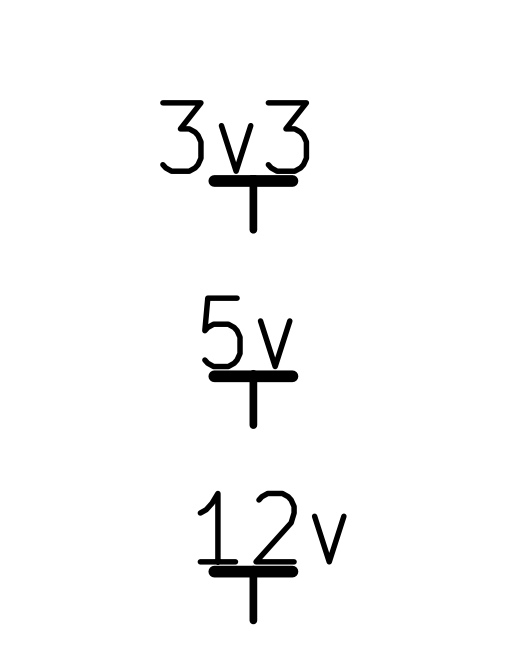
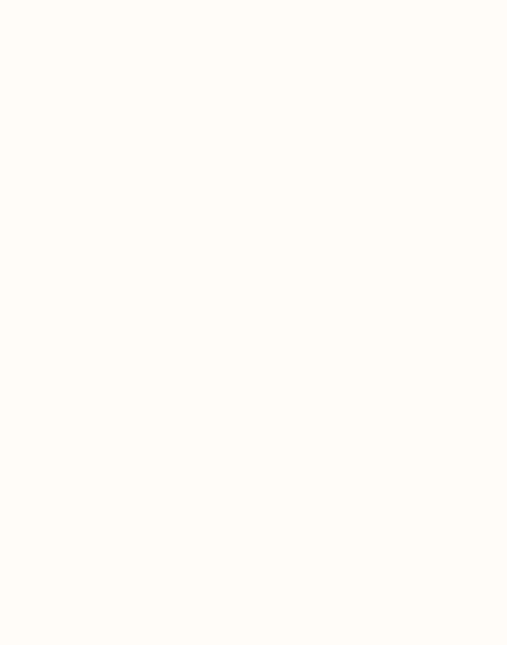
power symbol: (253, 204) -> none
power symbol: (253, 399) -> none
power symbol: (253, 595) -> none

